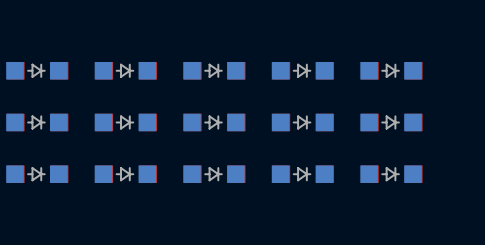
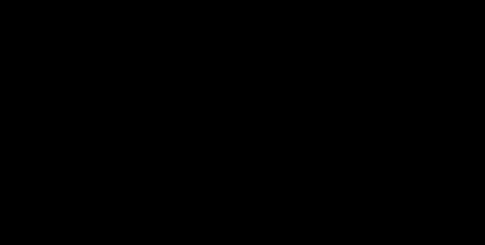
part: (37, 70) -> none
part: (125, 70) -> none
part: (214, 70) -> none
part: (302, 70) -> none
part: (391, 70) -> none
part: (37, 122) -> none
part: (125, 122) -> none
part: (214, 122) -> none
part: (302, 122) -> none
part: (391, 122) -> none
part: (37, 174) -> none
part: (125, 174) -> none
part: (214, 174) -> none
part: (302, 174) -> none
part: (391, 174) -> none

